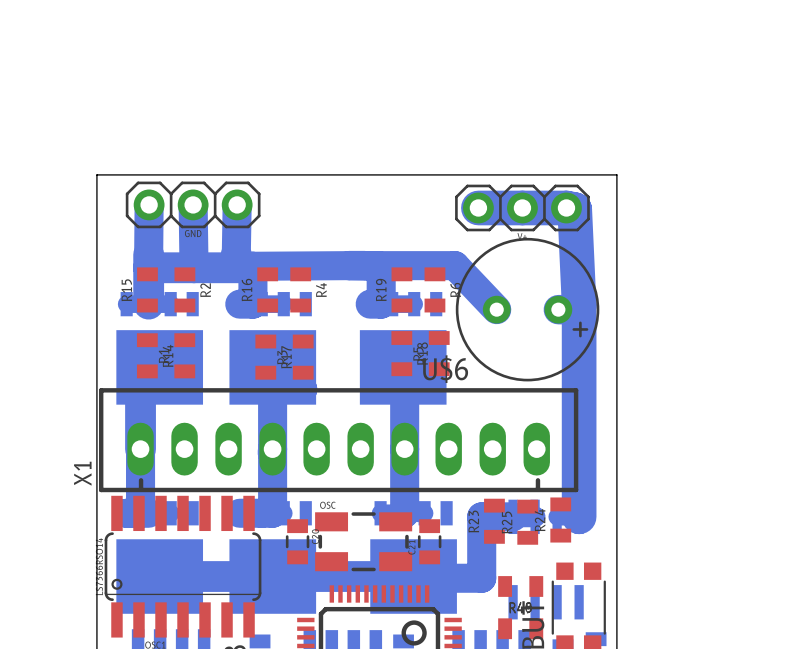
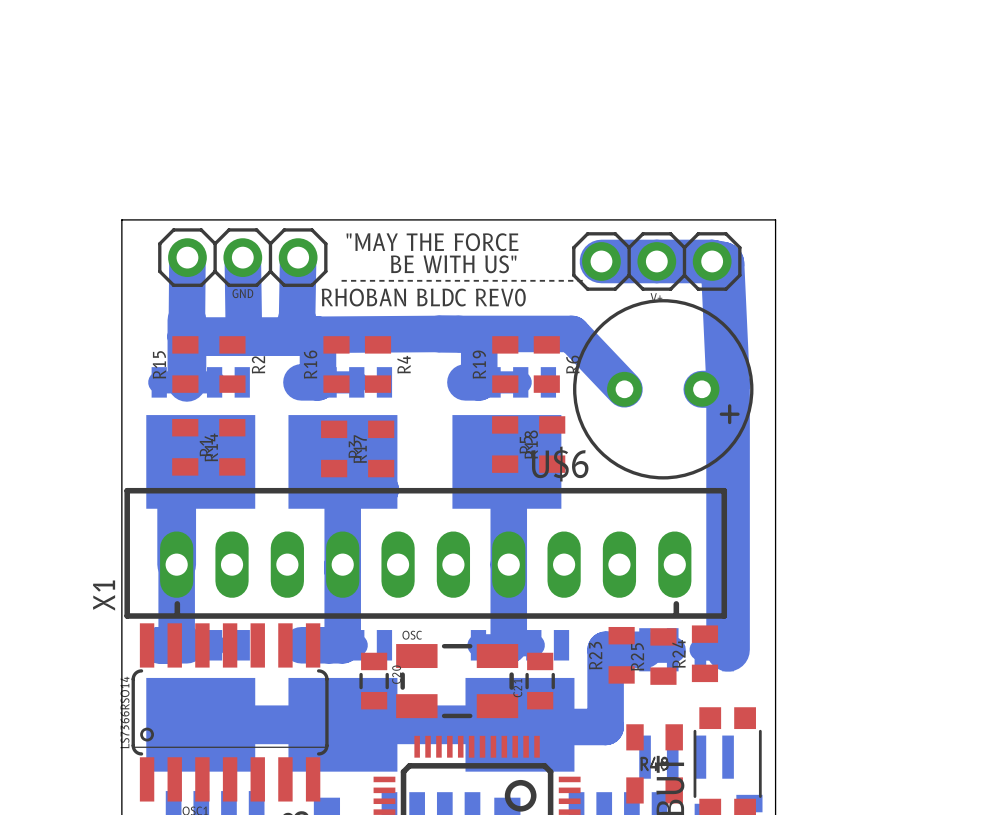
text: none -> "MAY THE FORCE (432, 242)
text: none -> BE WITH US" (453, 264)
text: none -> -------------------------- (462, 280)
text: none -> RHOBAN BLDC REV0 (423, 297)

